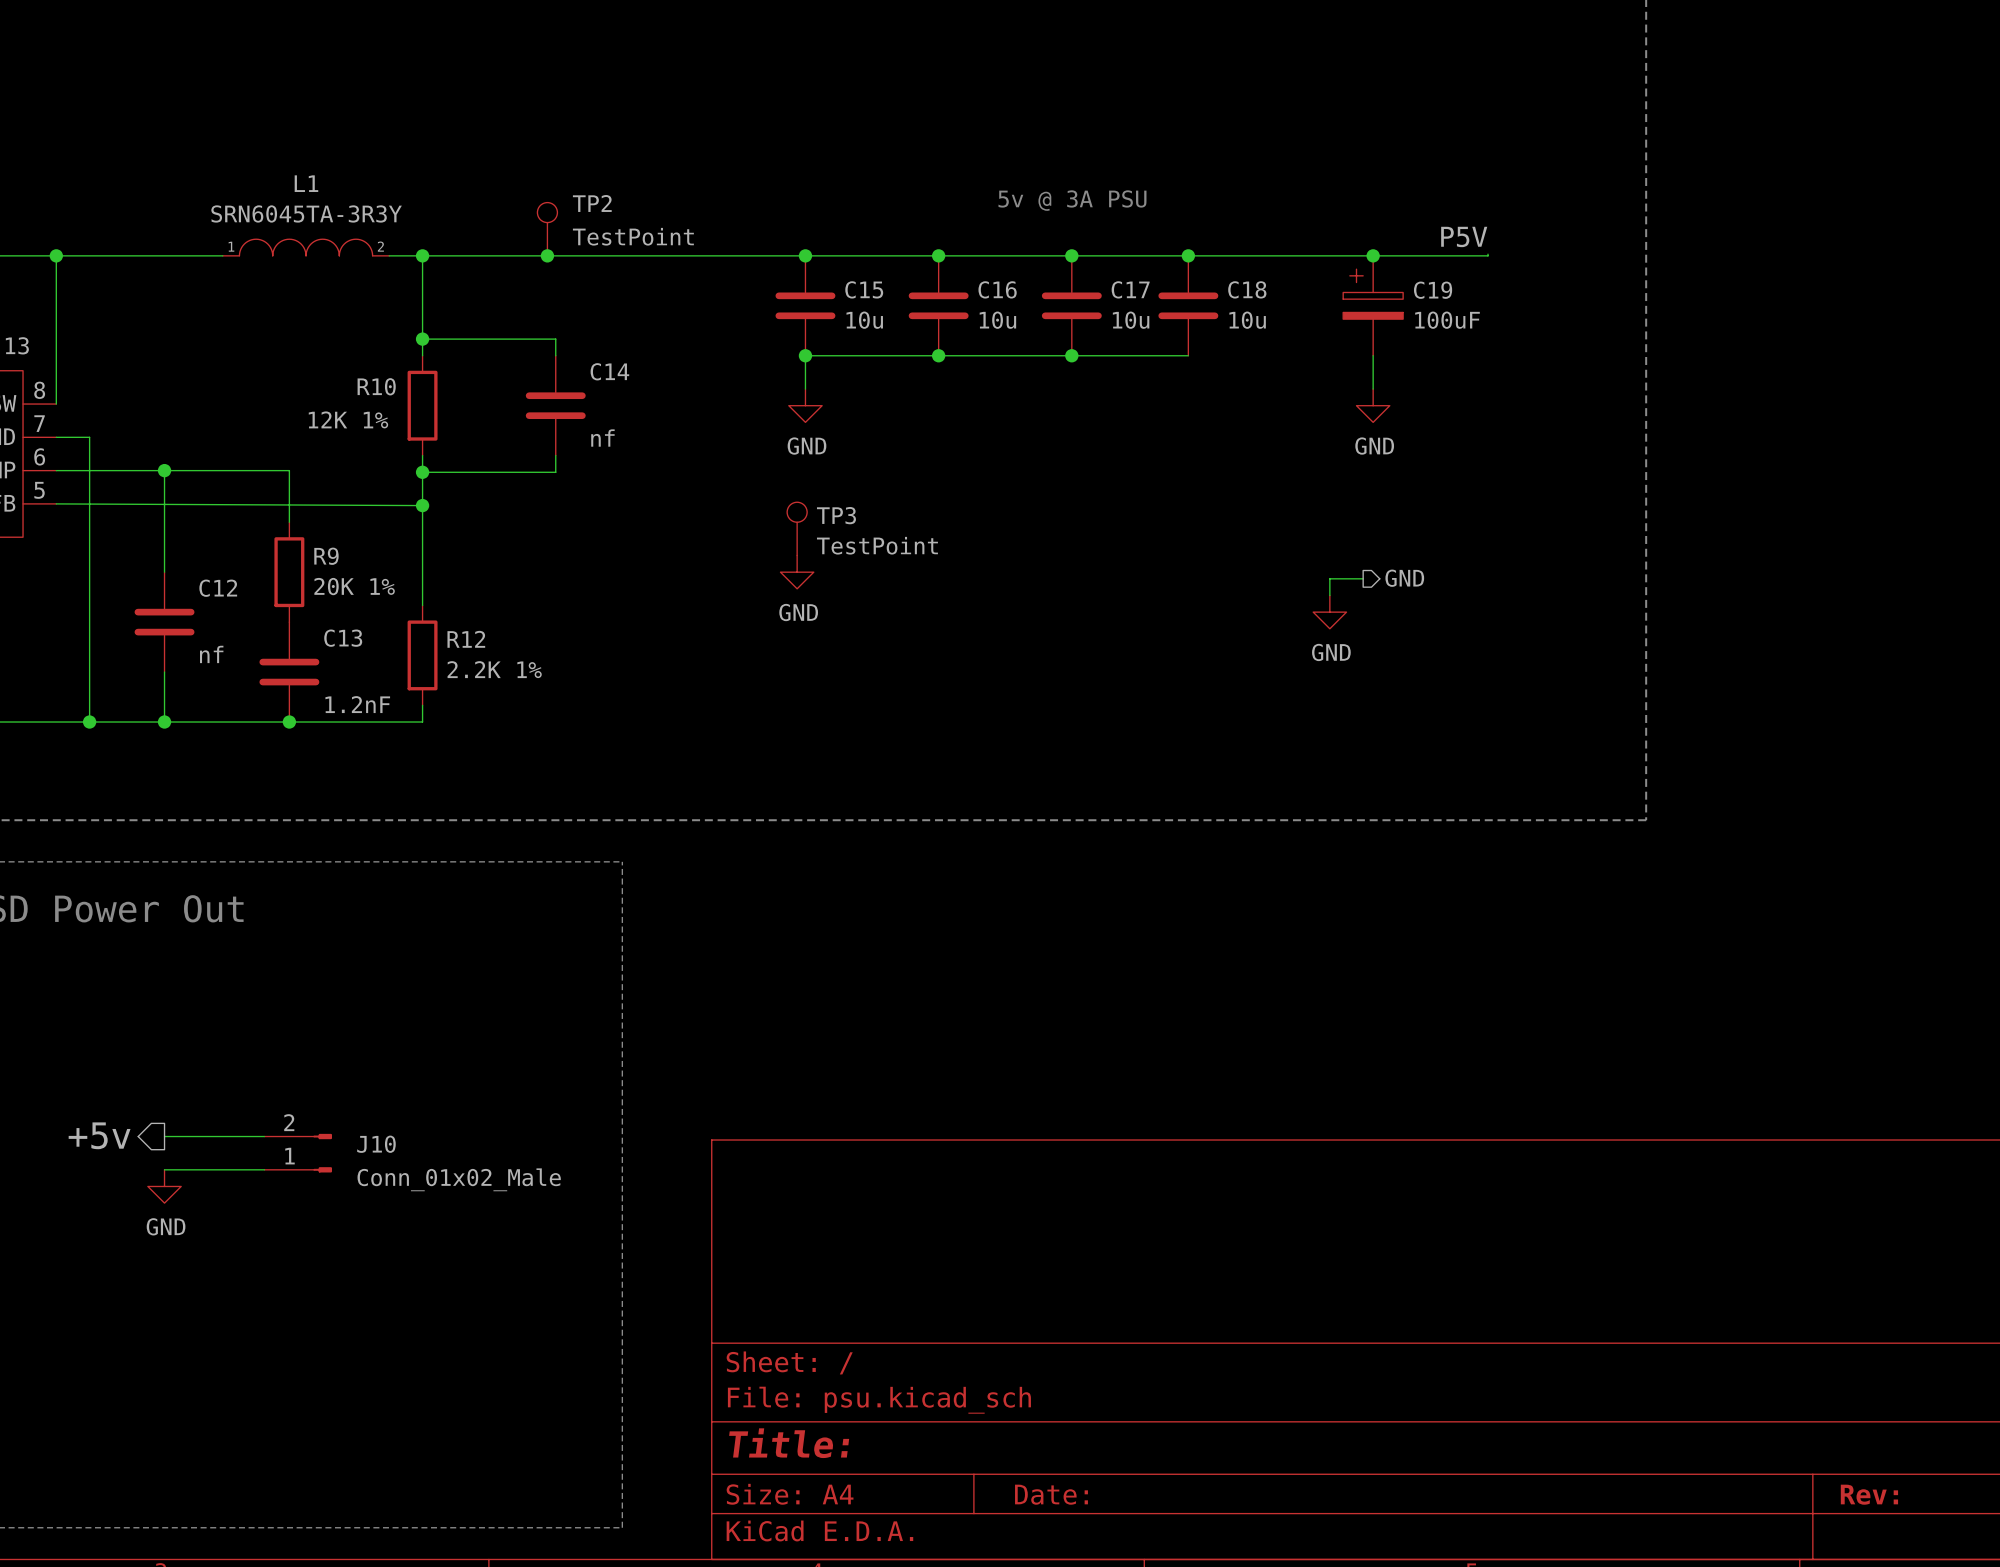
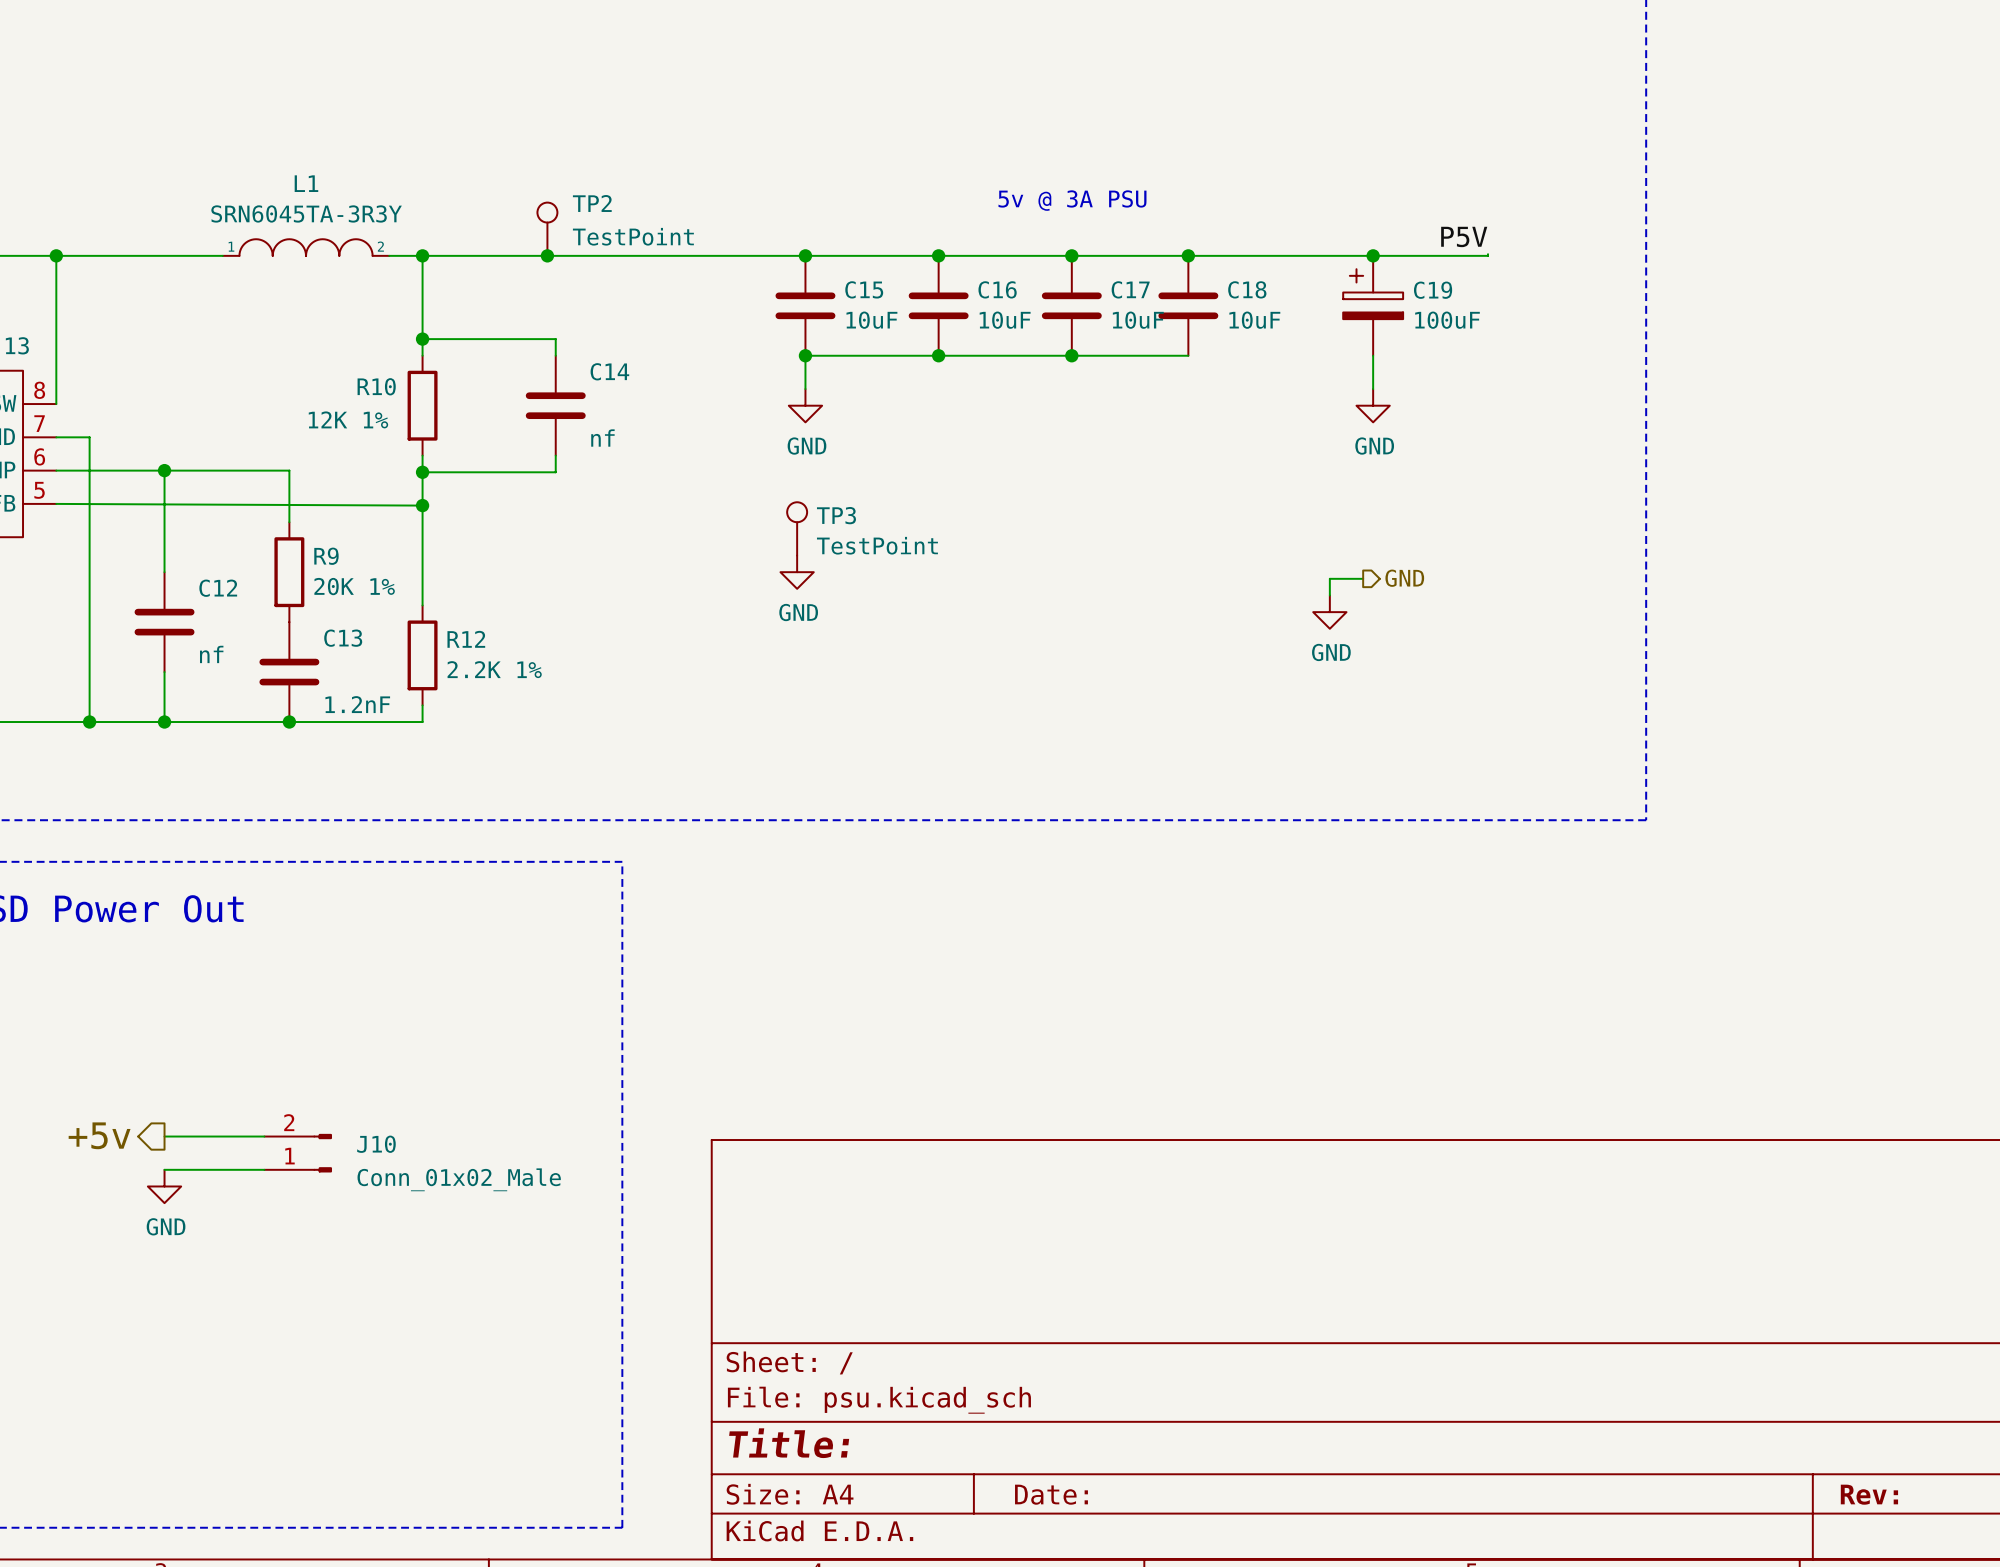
C15 value: 10u (864, 320) -> 10uF (871, 320)
C16 value: 10u (997, 320) -> 10uF (1005, 320)
C17 value: 10u (1131, 320) -> 10uF (1138, 320)
C18 value: 10u (1247, 320) -> 10uF (1254, 320)

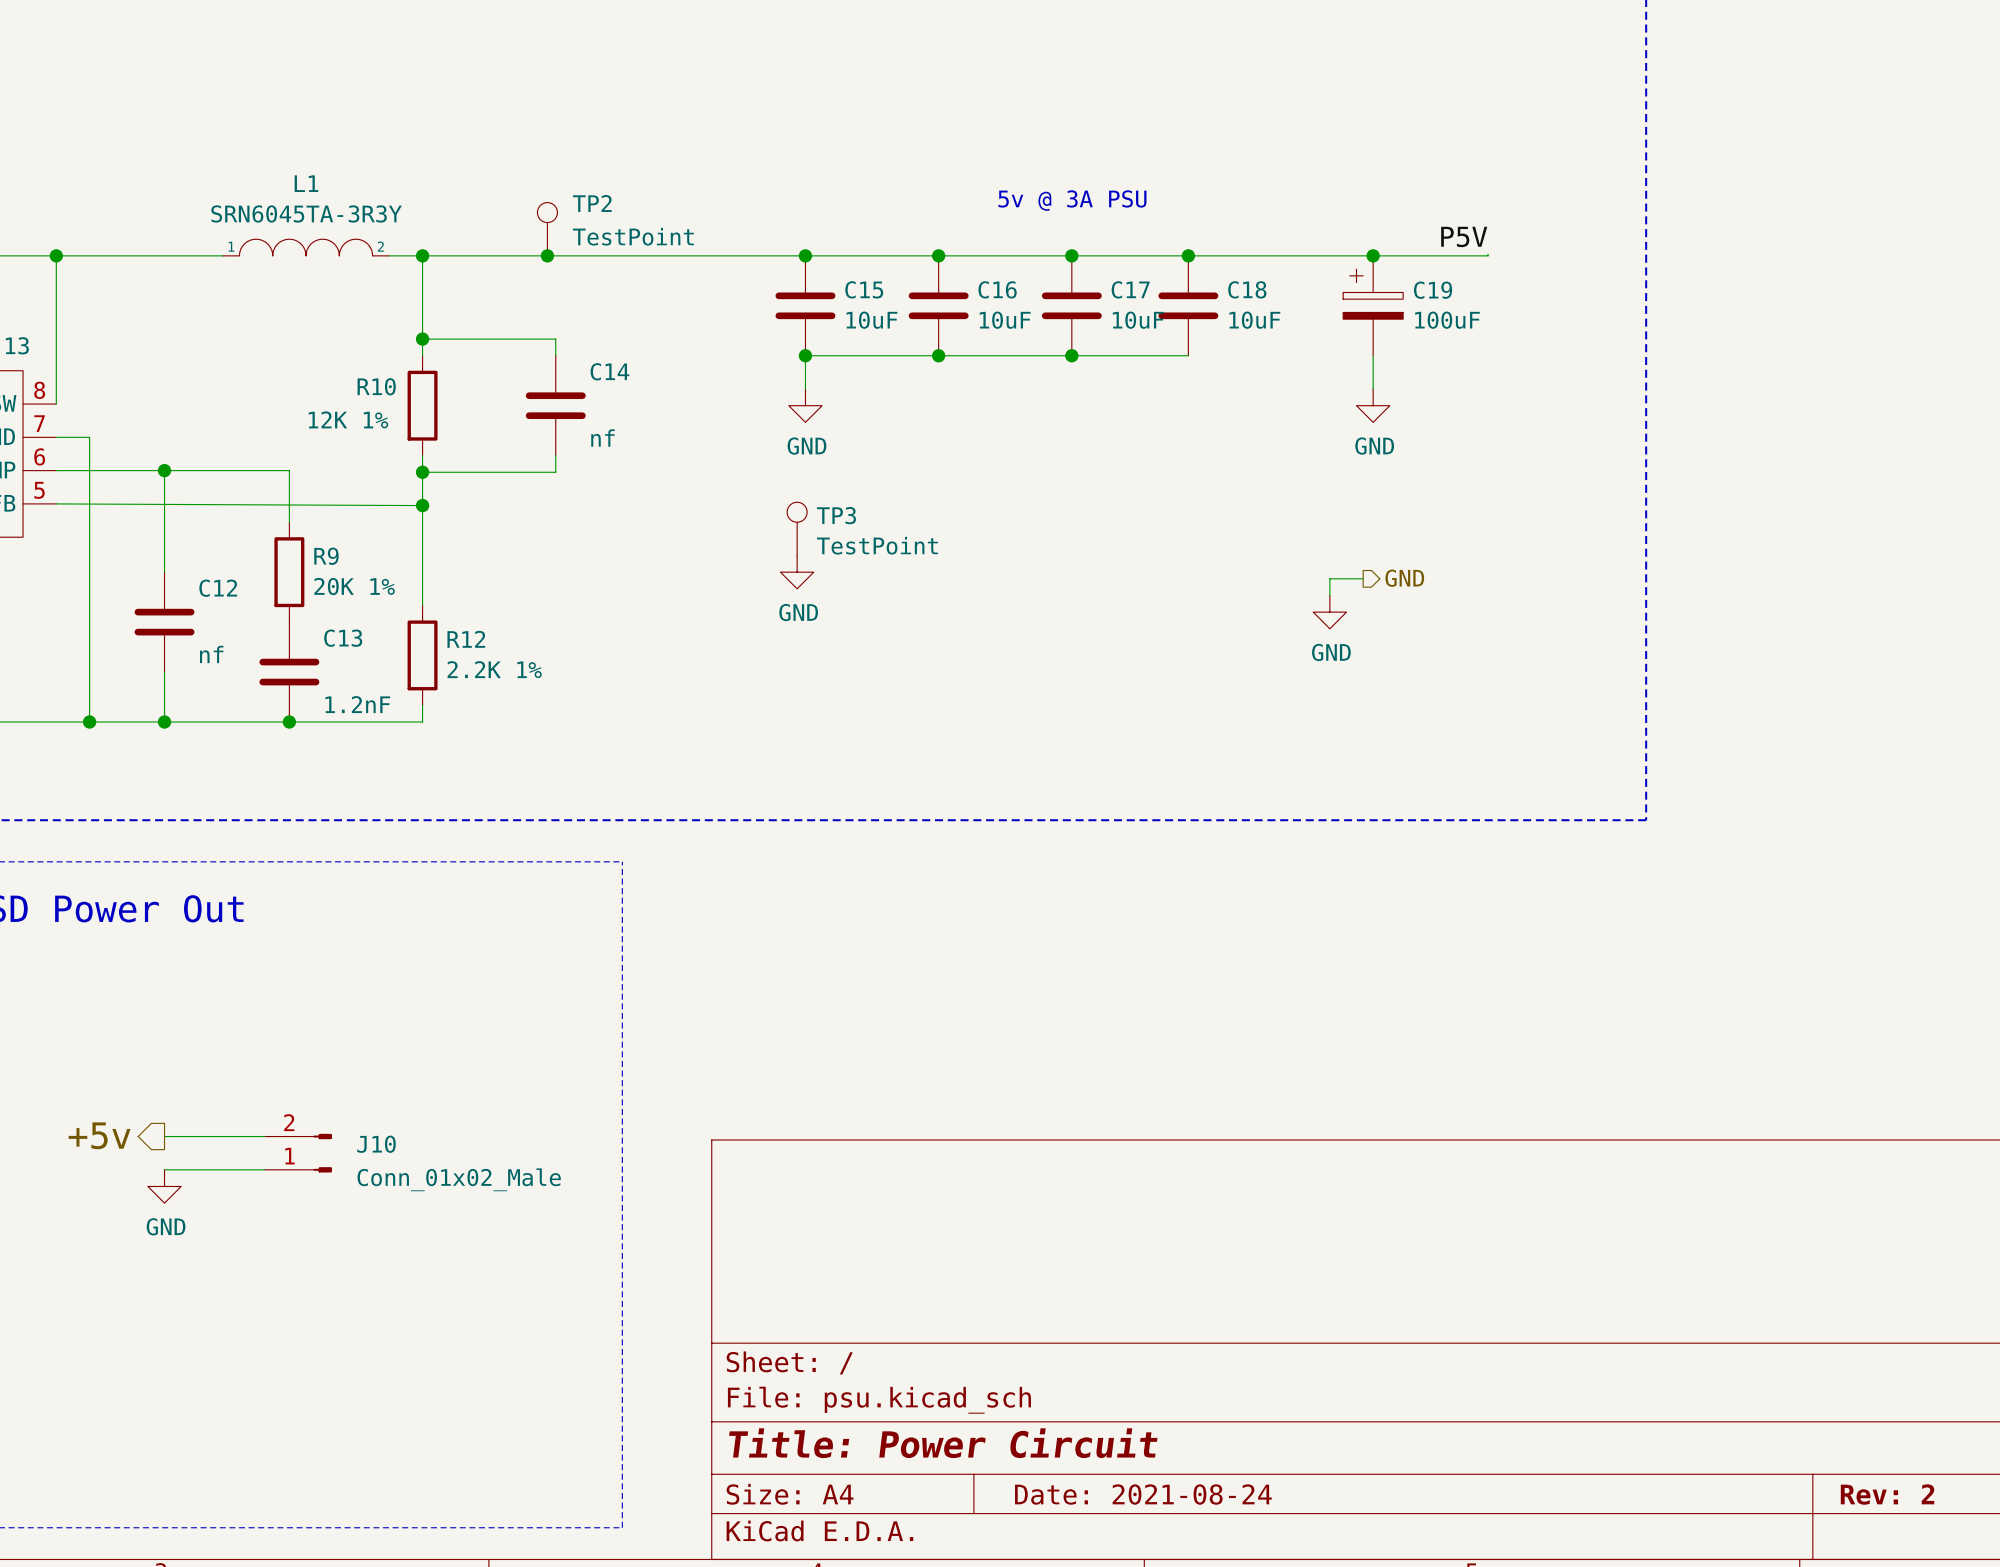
title block: Title: (789, 1443) -> Title: Power Circuit (943, 1443)
title block: Date: (1051, 1494) -> Date: 2021-08-24 (1143, 1494)
title block: Rev: (1869, 1494) -> Rev: 2 (1887, 1494)

